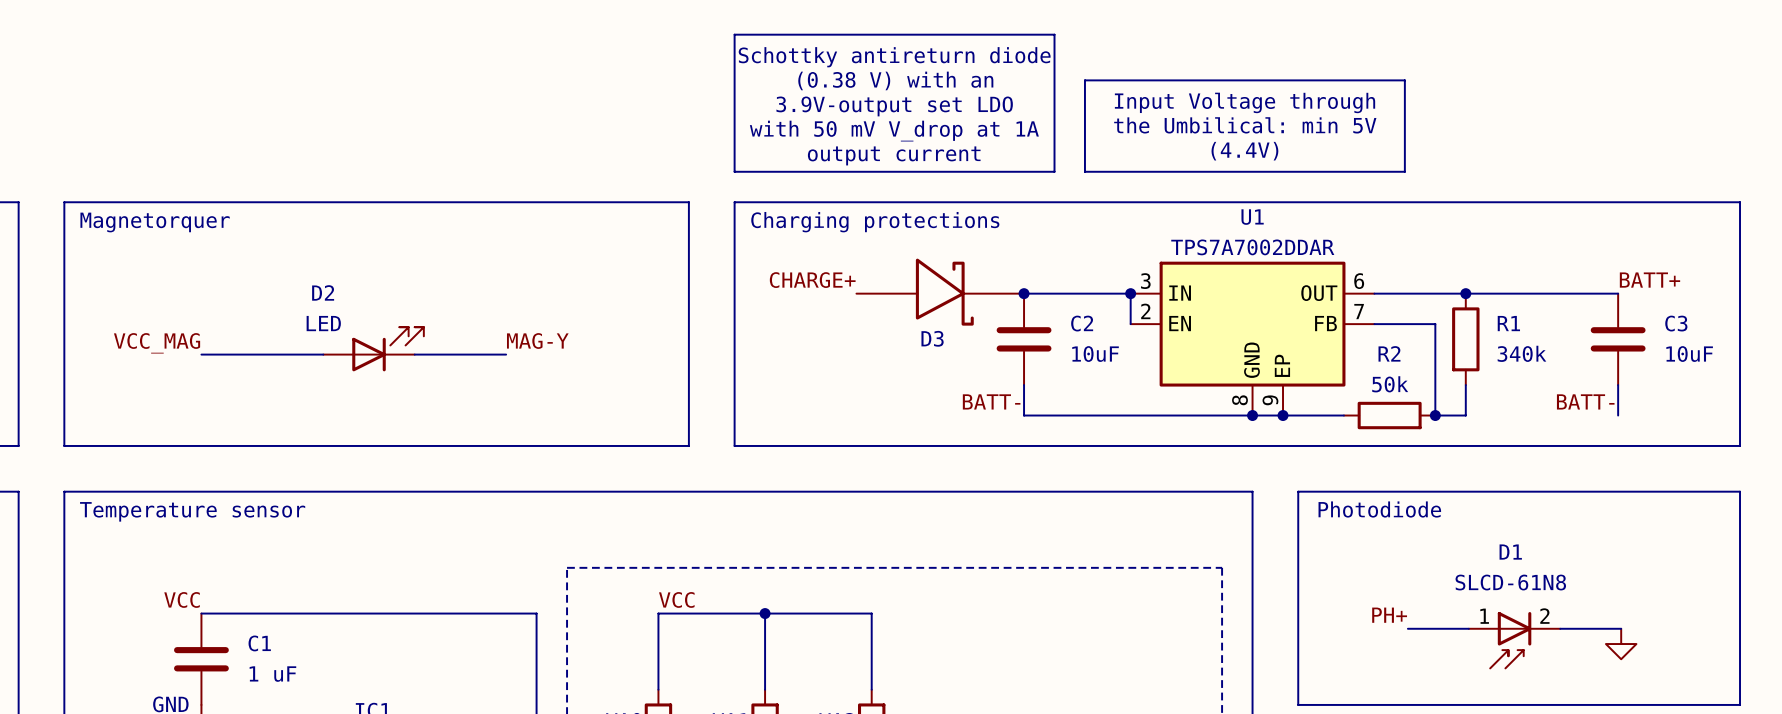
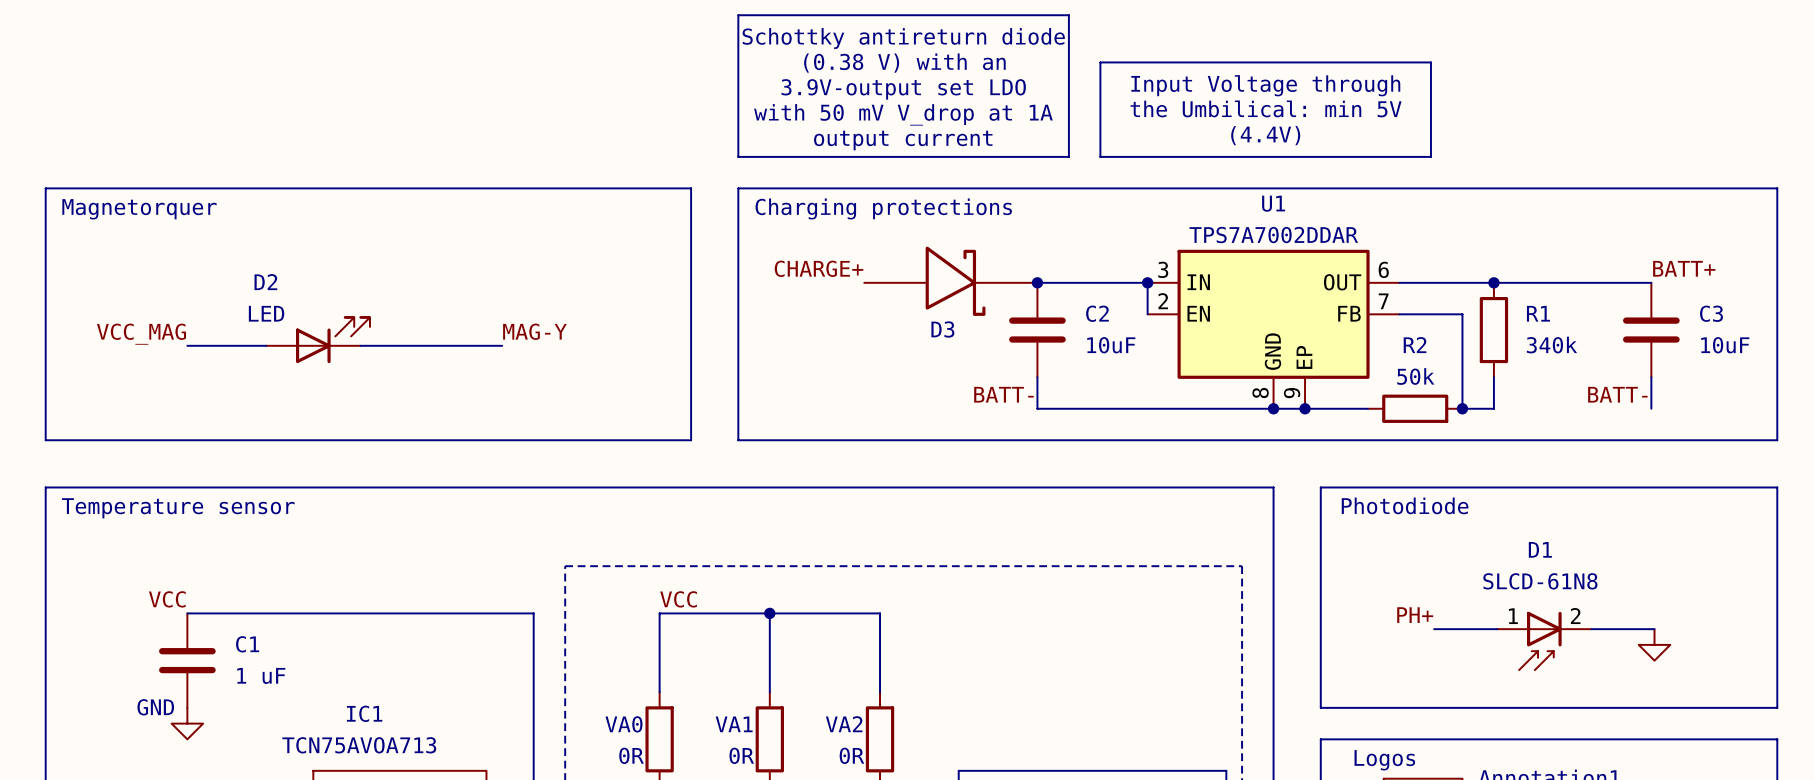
D2 position: (373, 349) -> (318, 340)

